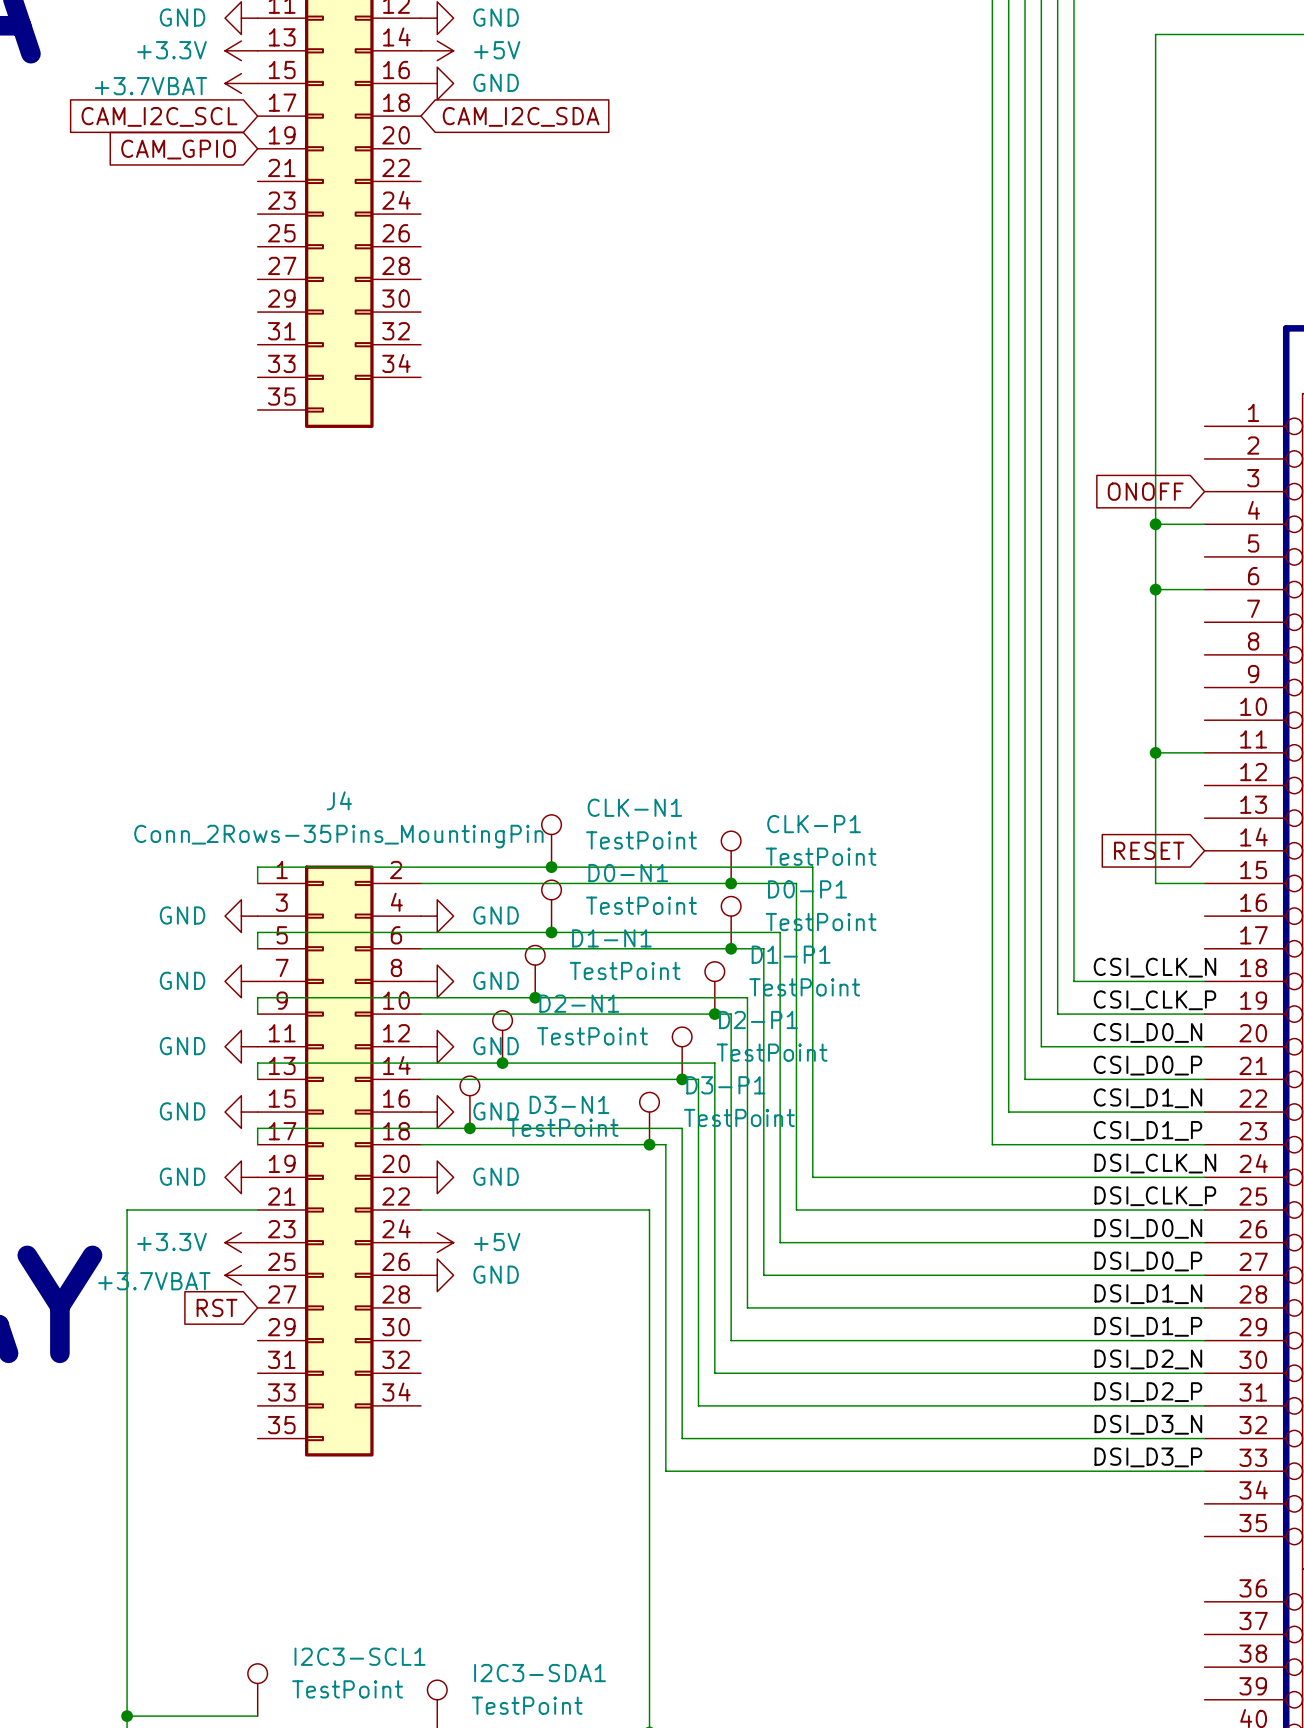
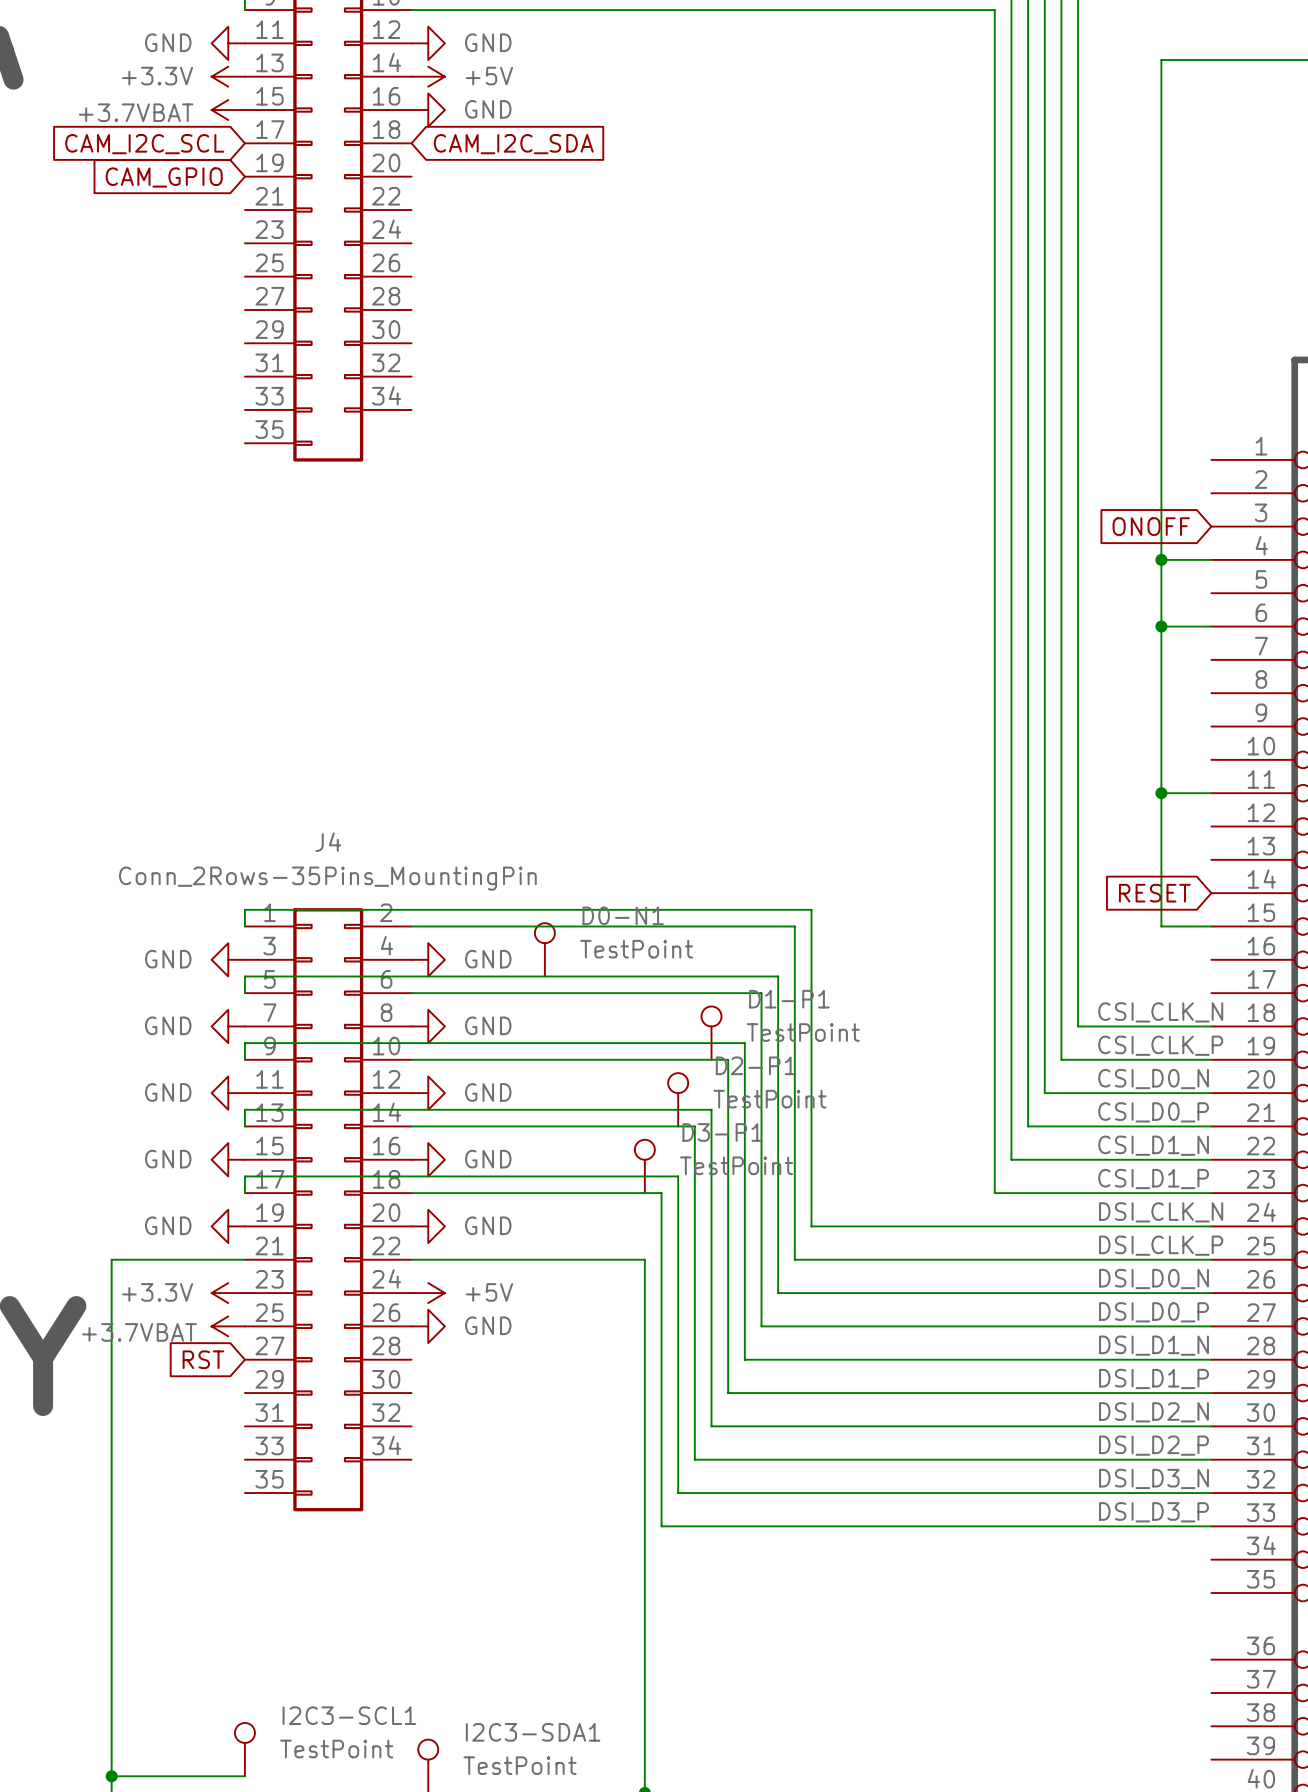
CLK-N1: TestPoint (551, 841) -> none
CLK-P1: TestPoint (731, 857) -> none
junction: (551, 867) -> none
junction: (731, 883) -> none
D0-P1: TestPoint (731, 922) -> none
junction: (551, 932) -> none
junction: (731, 948) -> none
D1-N1: TestPoint (535, 971) -> none
junction: (535, 997) -> none
junction: (714, 1014) -> none
D2-N1: TestPoint (502, 1036) -> none
junction: (502, 1063) -> none
junction: (682, 1079) -> none
D3-N1: TestPoint (469, 1102) -> none
junction: (469, 1128) -> none
junction: (649, 1144) -> none

